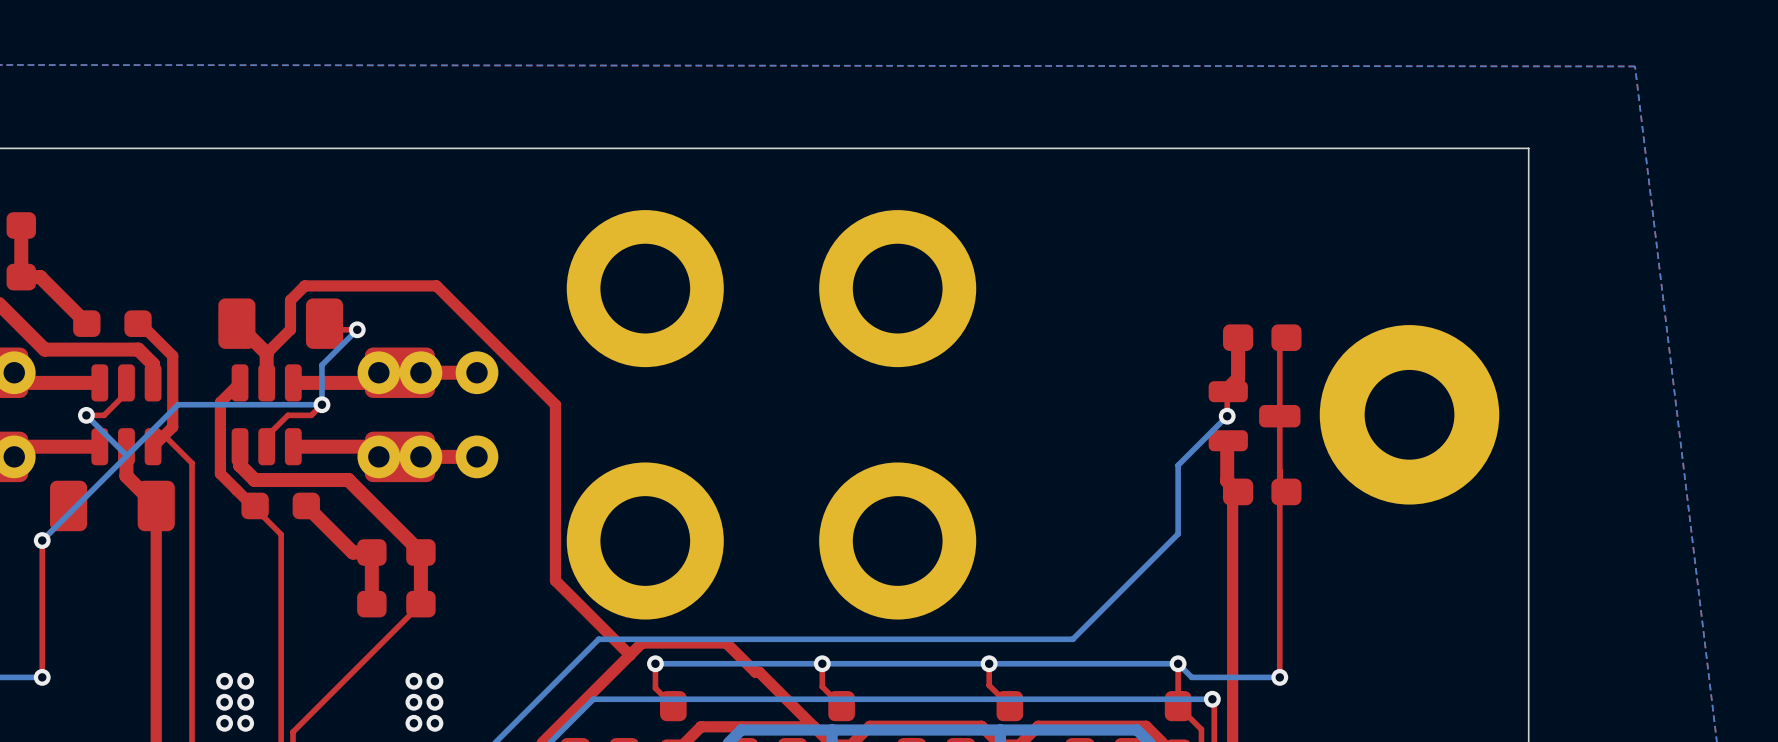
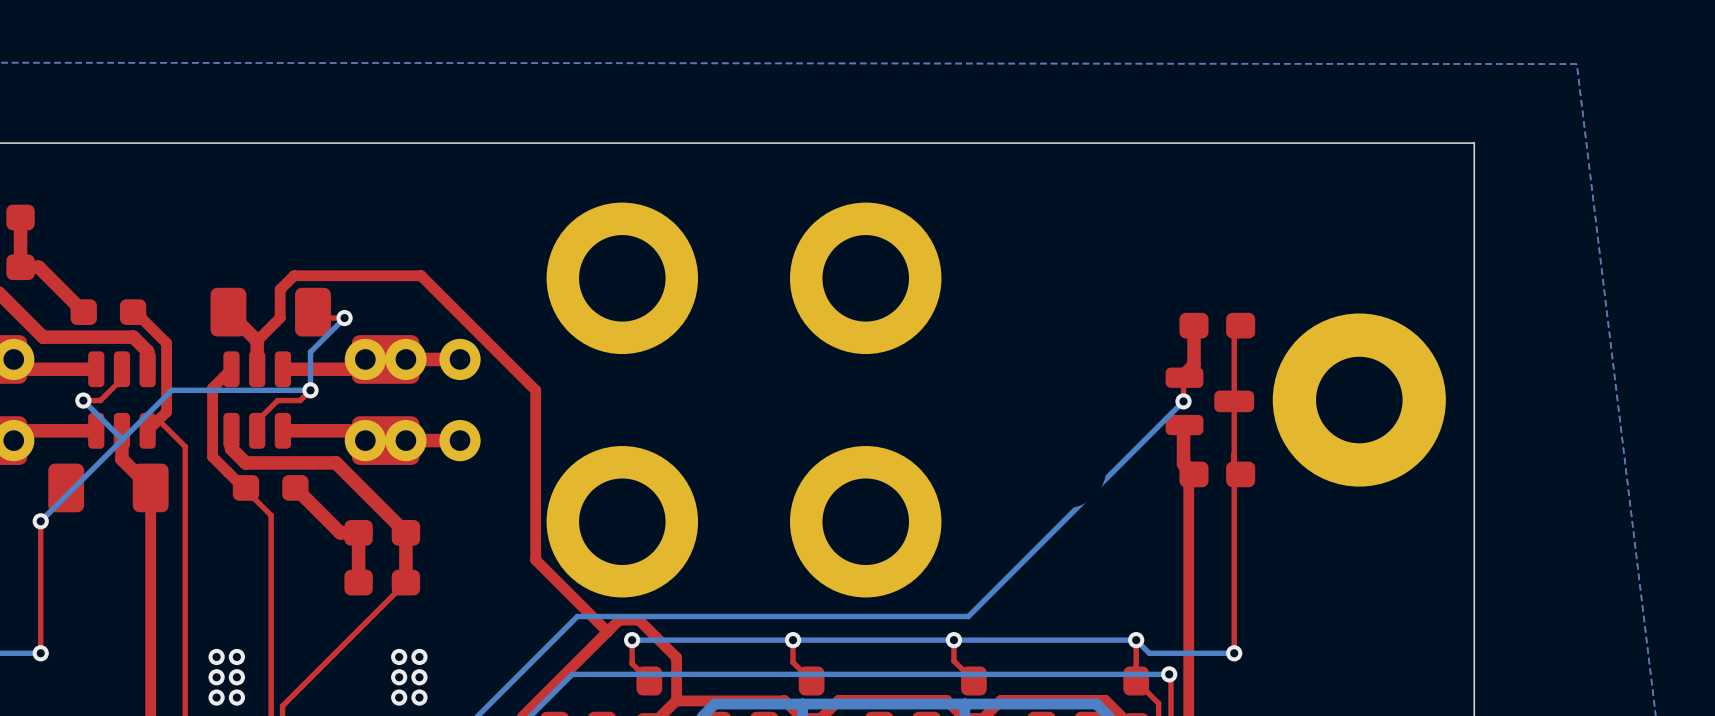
bottom track: (1178, 465) (1178, 533) (1072, 639) (1004, 639) -> (1136, 448) (968, 616)
top track: (662, 643) (726, 643) (755, 672) (759, 672) (813, 726) -> (639, 620) (676, 657) (676, 700)

